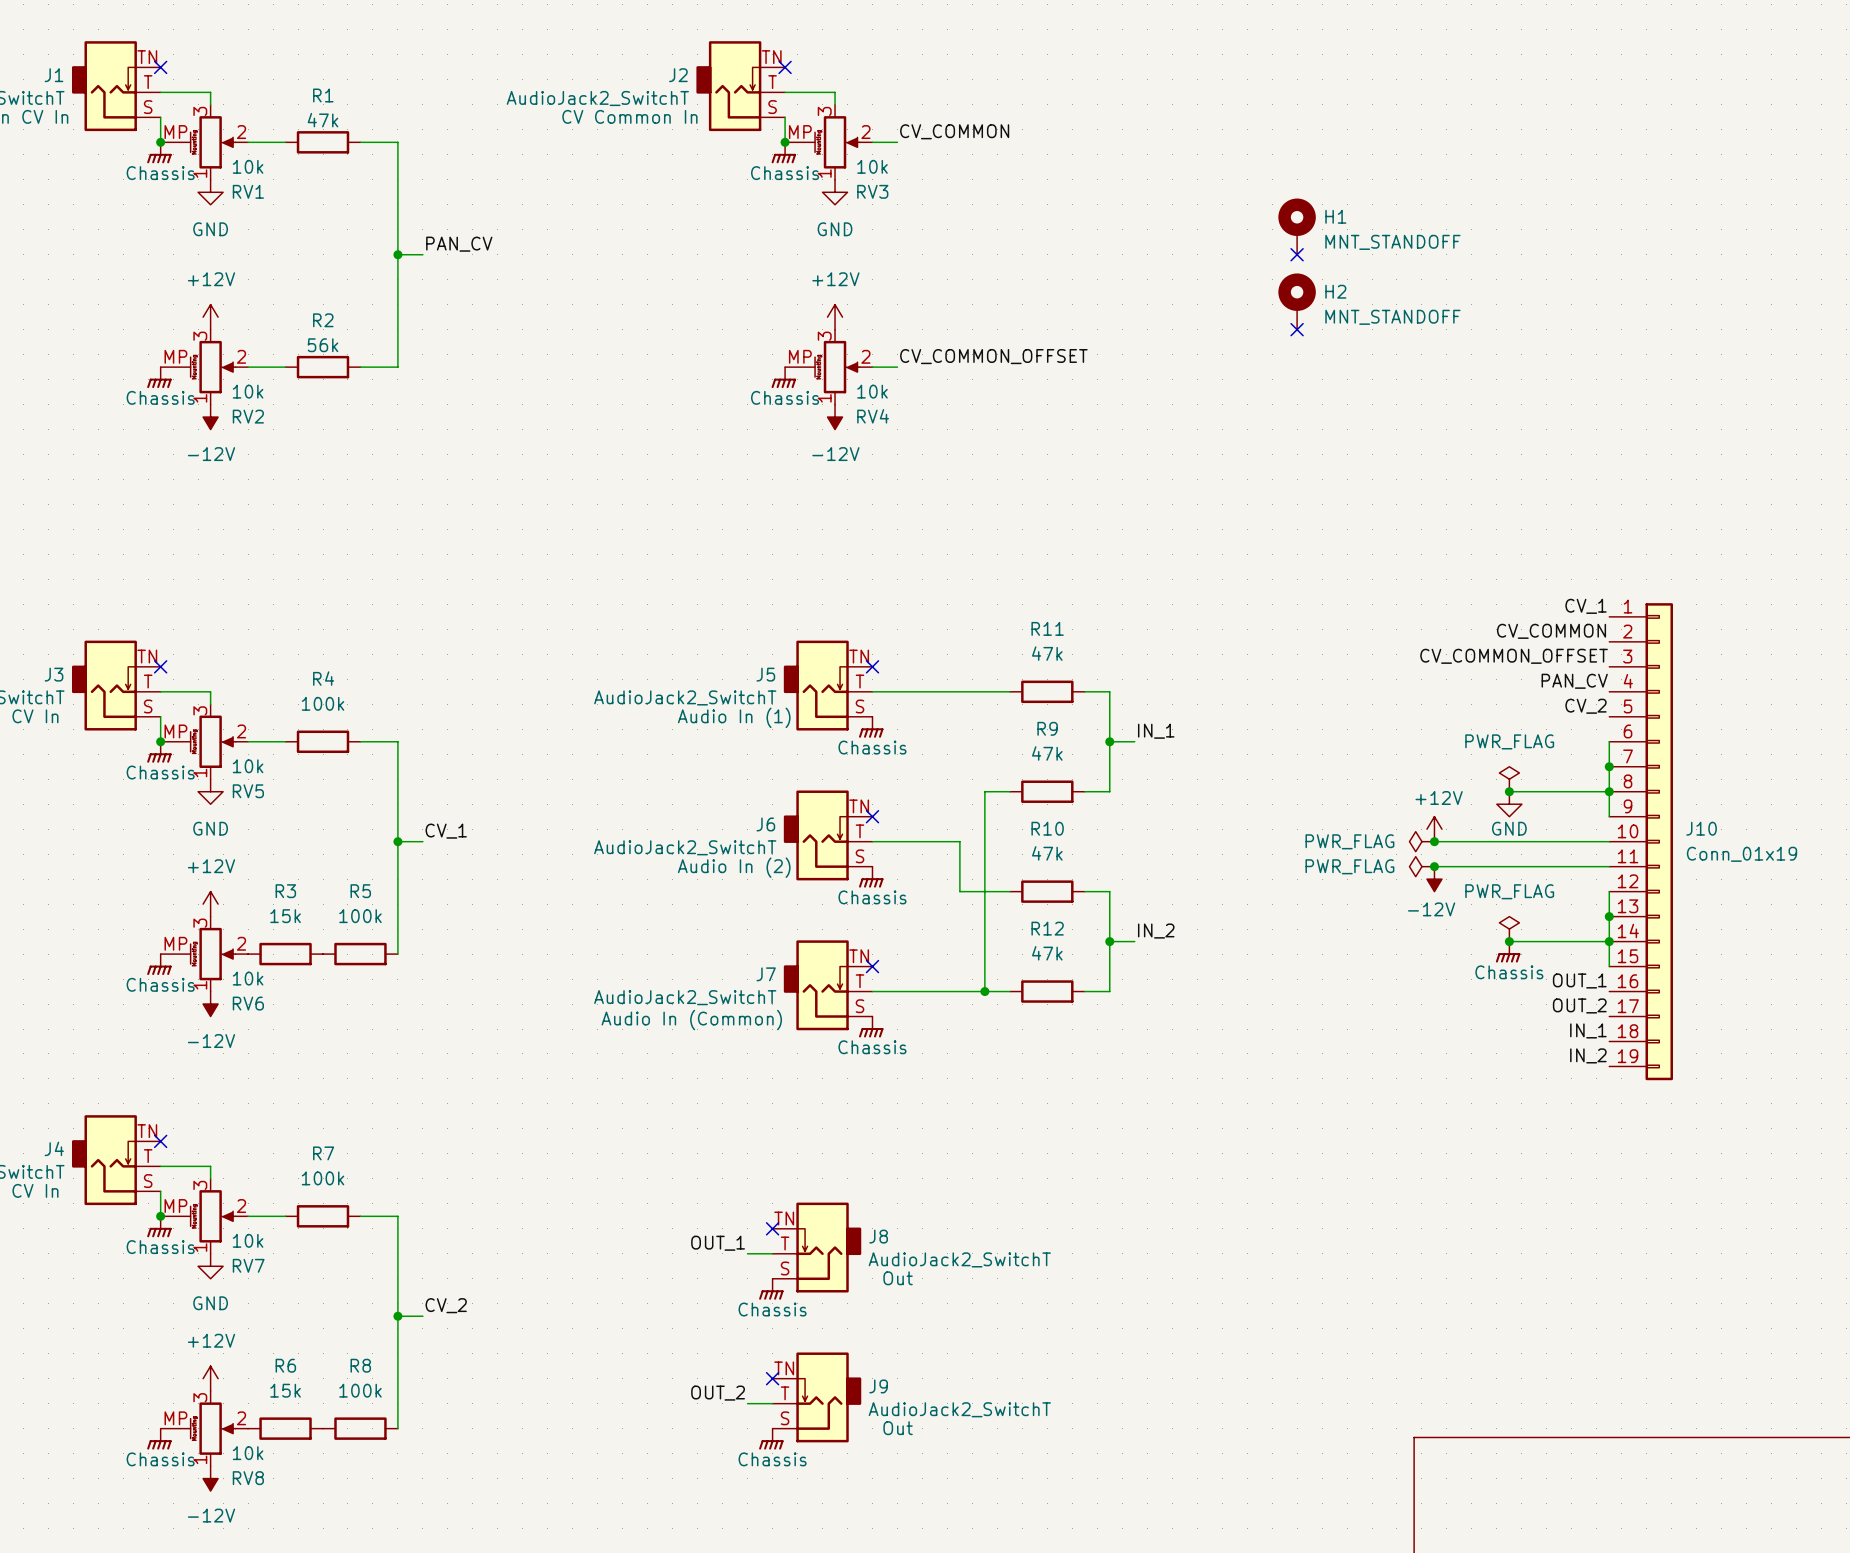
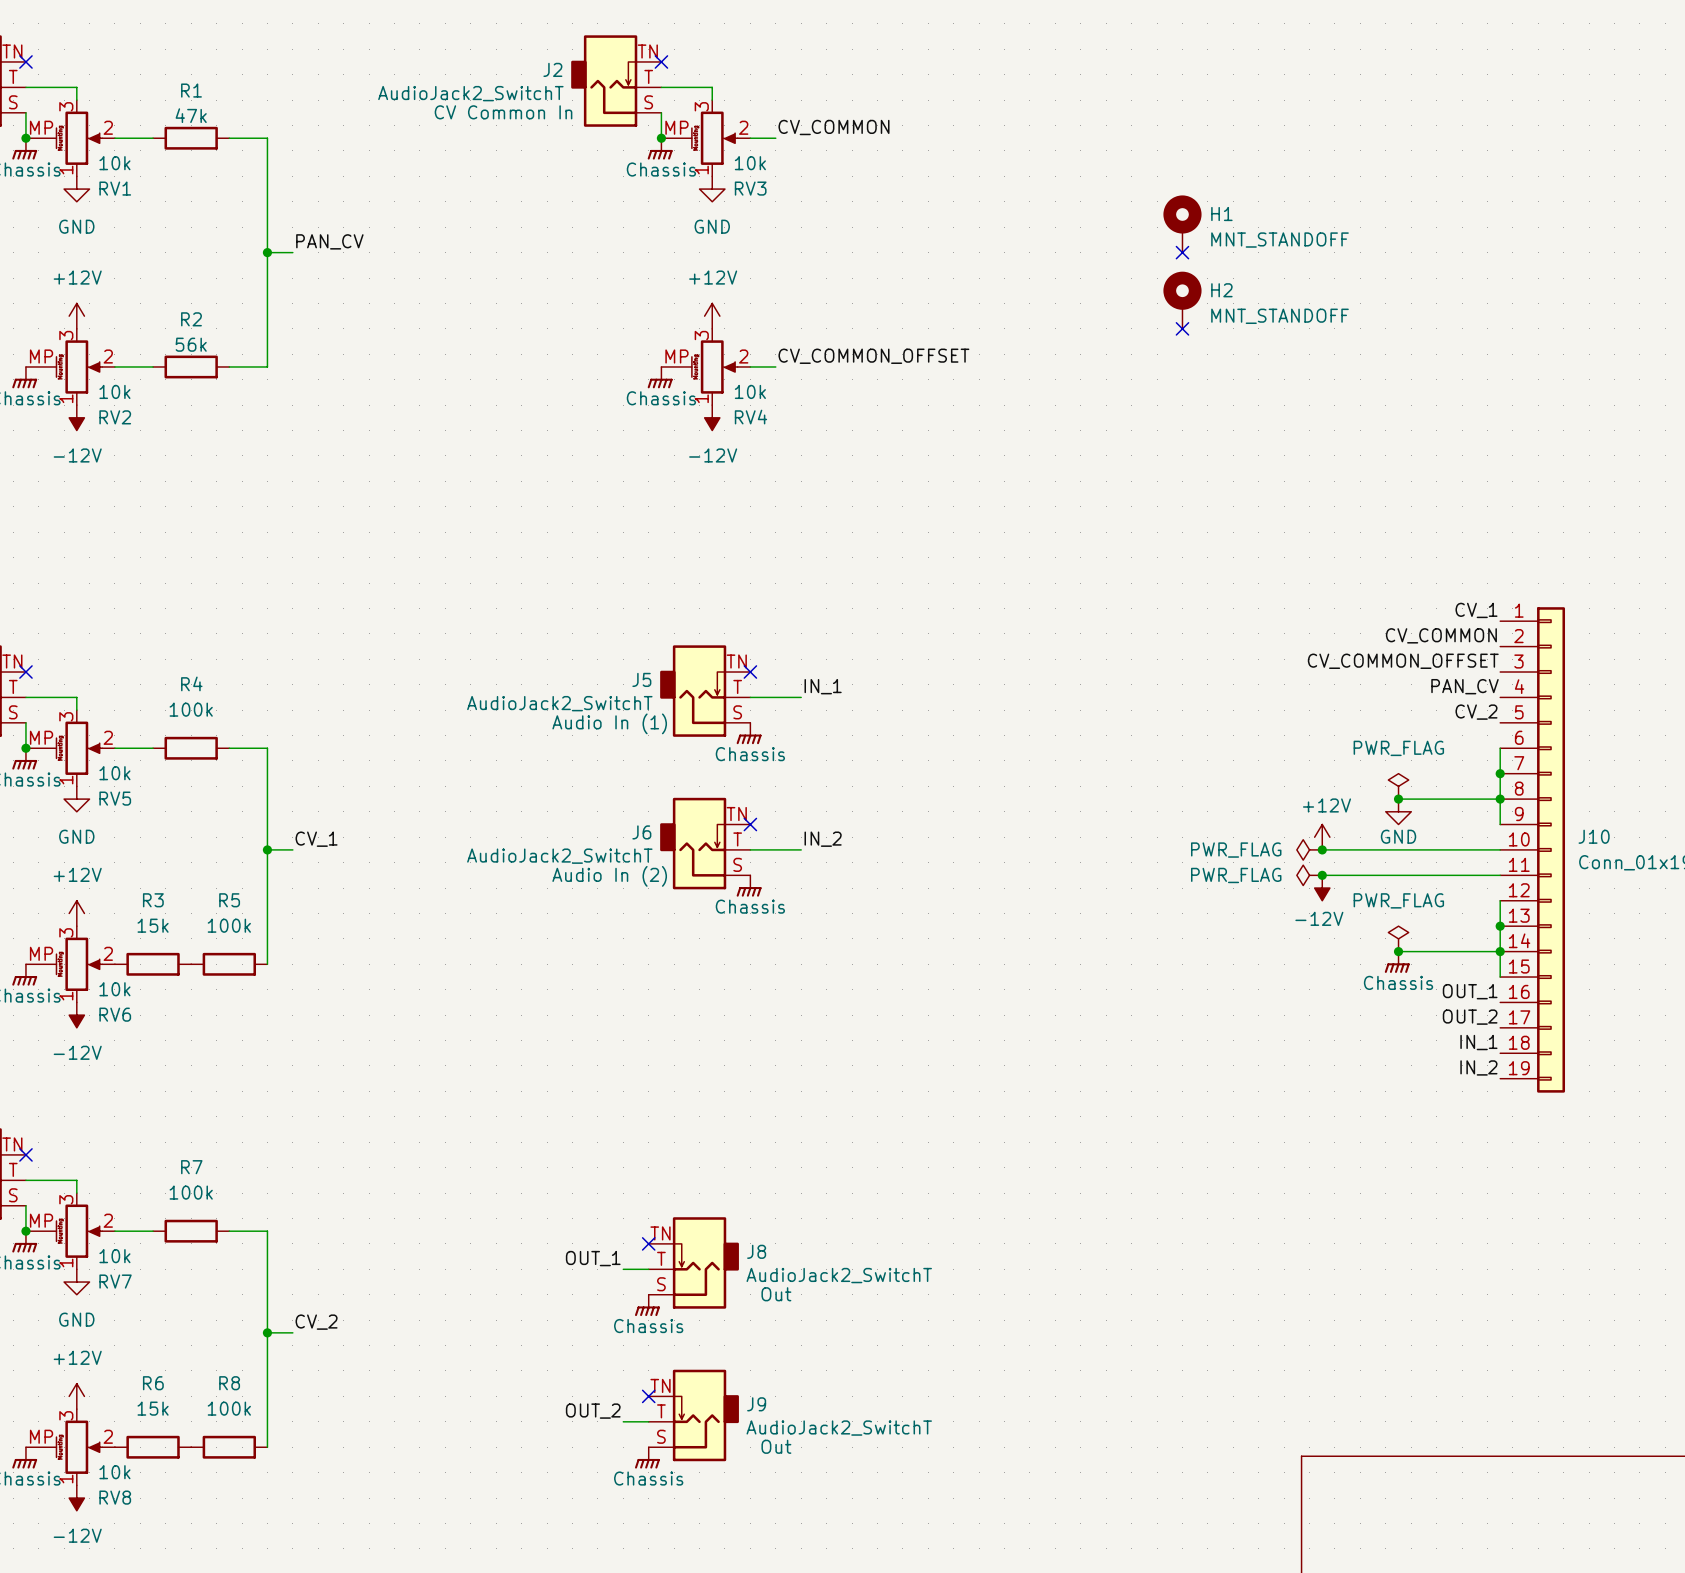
wire: (922, 691) (1009, 691) -> none
R11: 47k (1047, 691) -> none
wire: (1084, 691) (1109, 691) (1109, 791) (1084, 791) -> none
label position: IN_1 (1156, 731) -> IN_1 (823, 686)
wire: (1109, 741) (1134, 741) -> none
junction: (1109, 741) -> none
wire: (1009, 791) (984, 791) (984, 991) -> none
R9: 47k (1047, 791) -> none
wire: (922, 841) (959, 841) (959, 891) (1009, 891) -> none
R10: 47k (1047, 891) -> none
wire: (1084, 891) (1109, 891) (1109, 991) (1084, 991) -> none
label position: IN_2 (1156, 931) -> IN_2 (823, 839)
wire: (1109, 941) (1134, 941) -> none
junction: (1109, 941) -> none
no-connect mark: (872, 966) -> none
J7: AudioJack2_SwitchT (828, 985) -> none
wire: (872, 991) (1009, 991) -> none
junction: (984, 991) -> none
R12: 47k (1047, 991) -> none
power symbol: Chassis (871, 1027) -> none

